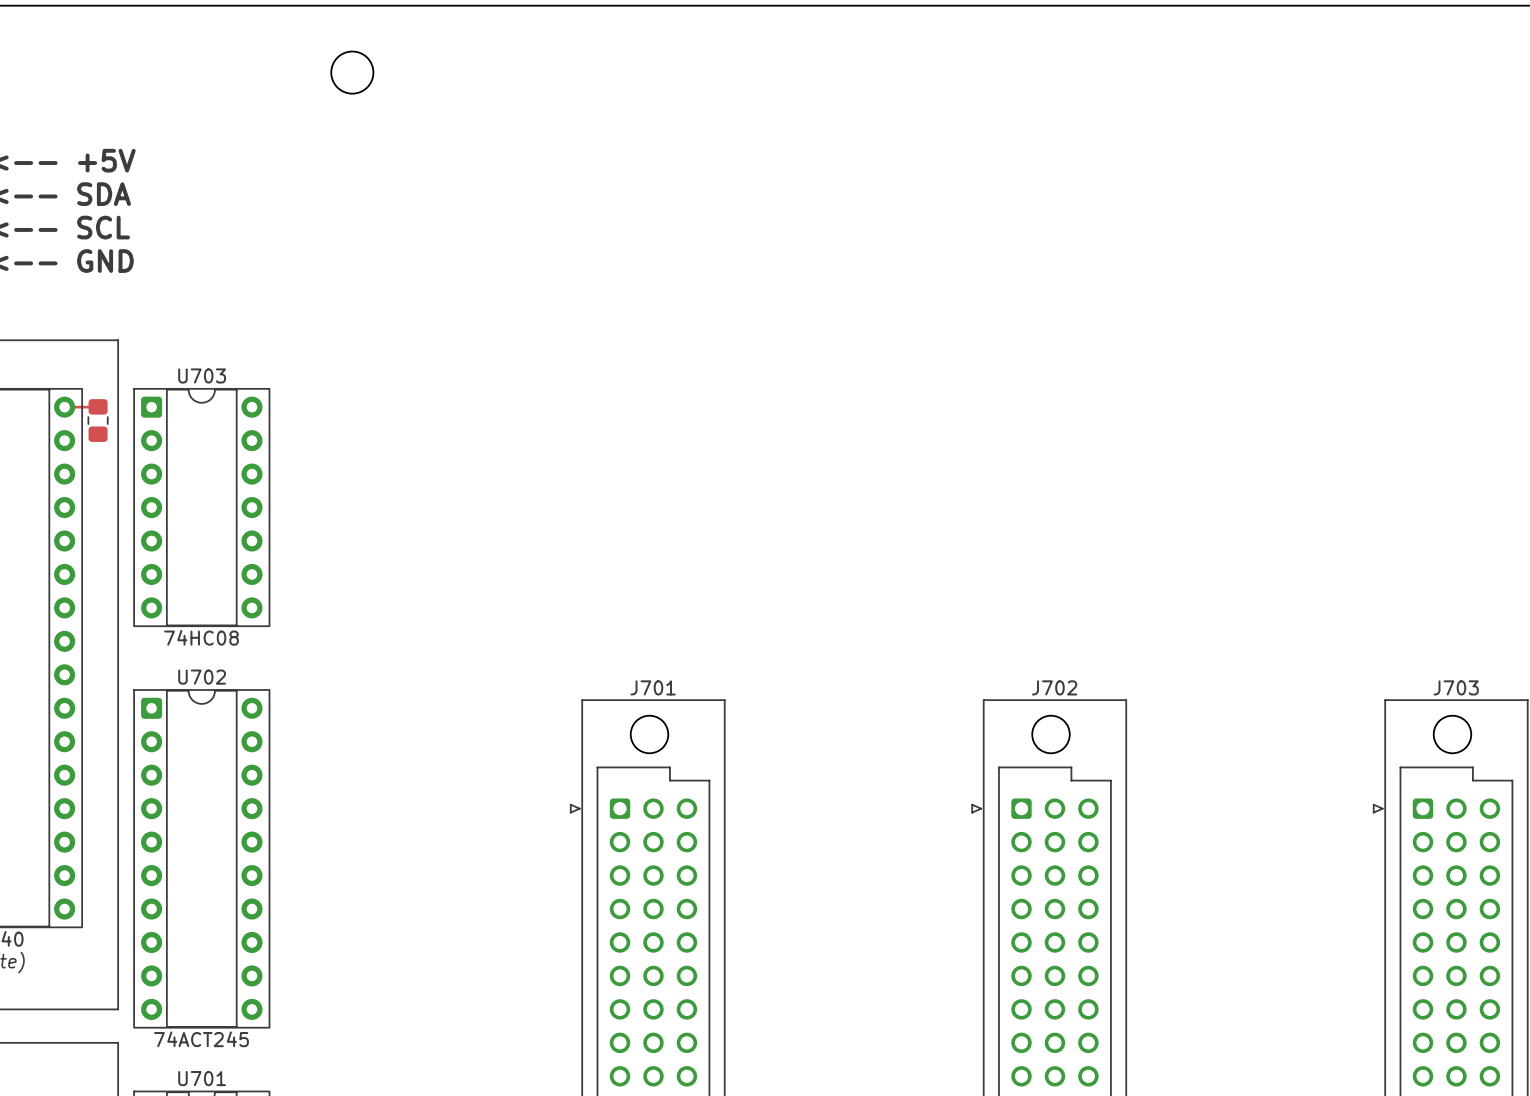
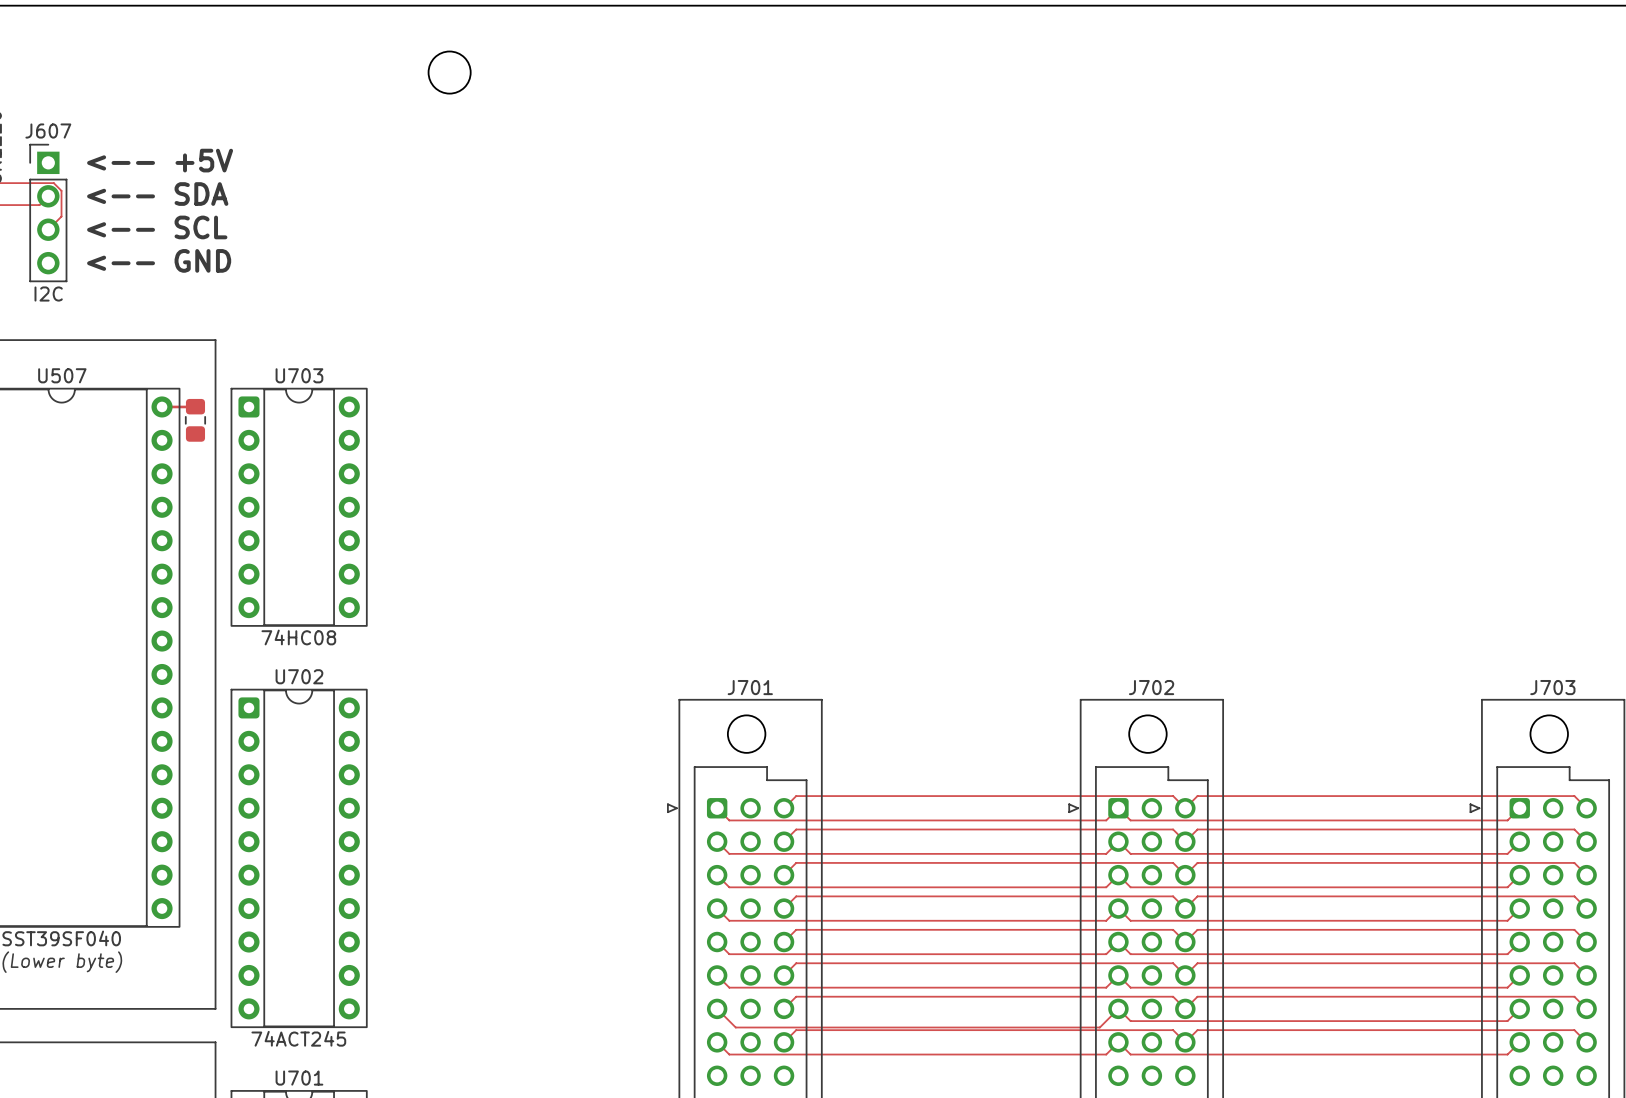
top track: none -> (717, 808) (729, 820) (1106, 820) (1118, 808) (1130, 820) (1507, 820) (1519, 808)
top track: none -> (784, 808) (796, 796) (1173, 796) (1185, 808) (1197, 796) (1574, 796) (1586, 808)
top track: none -> (717, 841) (729, 853) (1106, 853) (1118, 841) (1130, 853) (1507, 853) (1519, 841)
top track: none -> (784, 841) (796, 829) (1173, 829) (1185, 841) (1197, 829) (1574, 829) (1586, 841)
top track: none -> (717, 875) (729, 887) (1106, 887) (1118, 875) (1130, 887) (1507, 887) (1519, 875)
top track: none -> (784, 875) (796, 862) (1173, 862) (1185, 875) (1197, 862) (1574, 862) (1586, 875)
top track: none -> (717, 908) (729, 920) (1106, 920) (1118, 908) (1130, 920) (1507, 920) (1519, 908)
top track: none -> (784, 908) (796, 896) (1173, 896) (1185, 908) (1197, 896) (1574, 896) (1586, 908)
top track: none -> (717, 942) (729, 954) (1106, 954) (1118, 942) (1130, 954) (1507, 954) (1519, 942)
top track: none -> (784, 942) (796, 929) (1173, 929) (1185, 942) (1197, 929) (1574, 929) (1586, 942)
top track: none -> (717, 975) (729, 987) (1106, 987) (1118, 975) (1130, 987) (1507, 987) (1519, 975)
top track: none -> (784, 975) (796, 963) (1173, 963) (1185, 975) (1197, 963) (1574, 963) (1586, 975)
top track: none -> (717, 1008) (735, 1027) (1099, 1027) (1118, 1008) (1130, 1021) (1507, 1021) (1519, 1008)
top track: none -> (784, 1008) (796, 996) (1173, 996) (1185, 1008) (1197, 996) (1574, 996) (1586, 1008)
top track: none -> (717, 1042) (729, 1054) (1106, 1054) (1118, 1042) (1130, 1054) (1507, 1054) (1519, 1042)
top track: none -> (784, 1042) (796, 1030) (1173, 1030) (1185, 1042) (1197, 1030) (1574, 1030) (1586, 1042)

